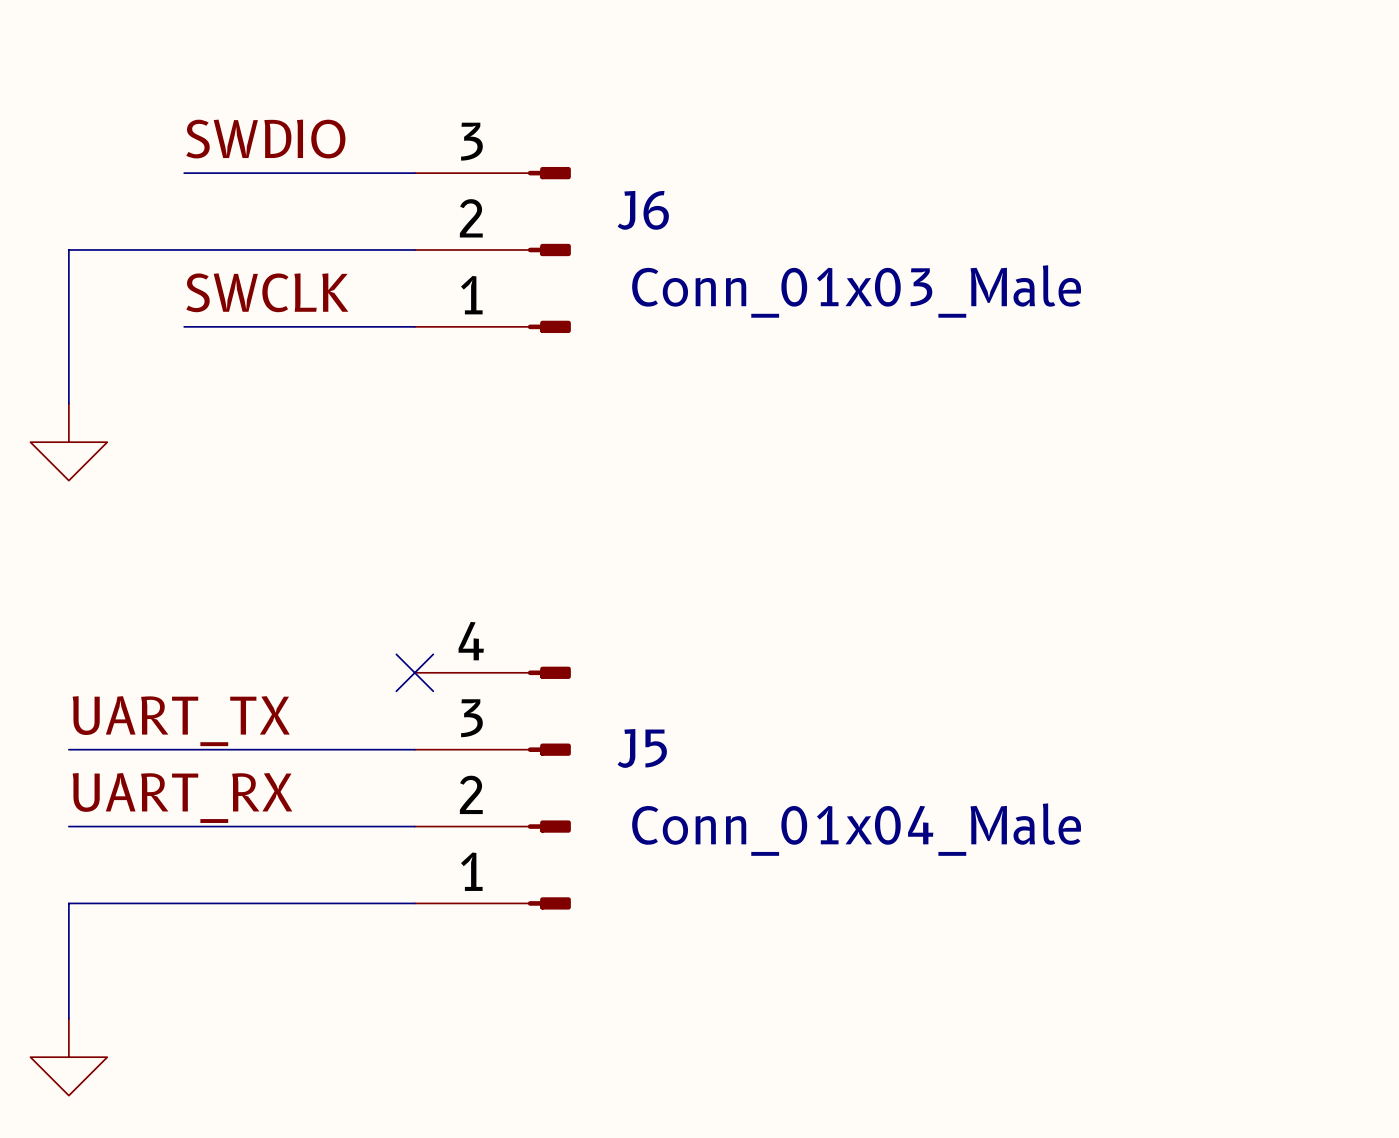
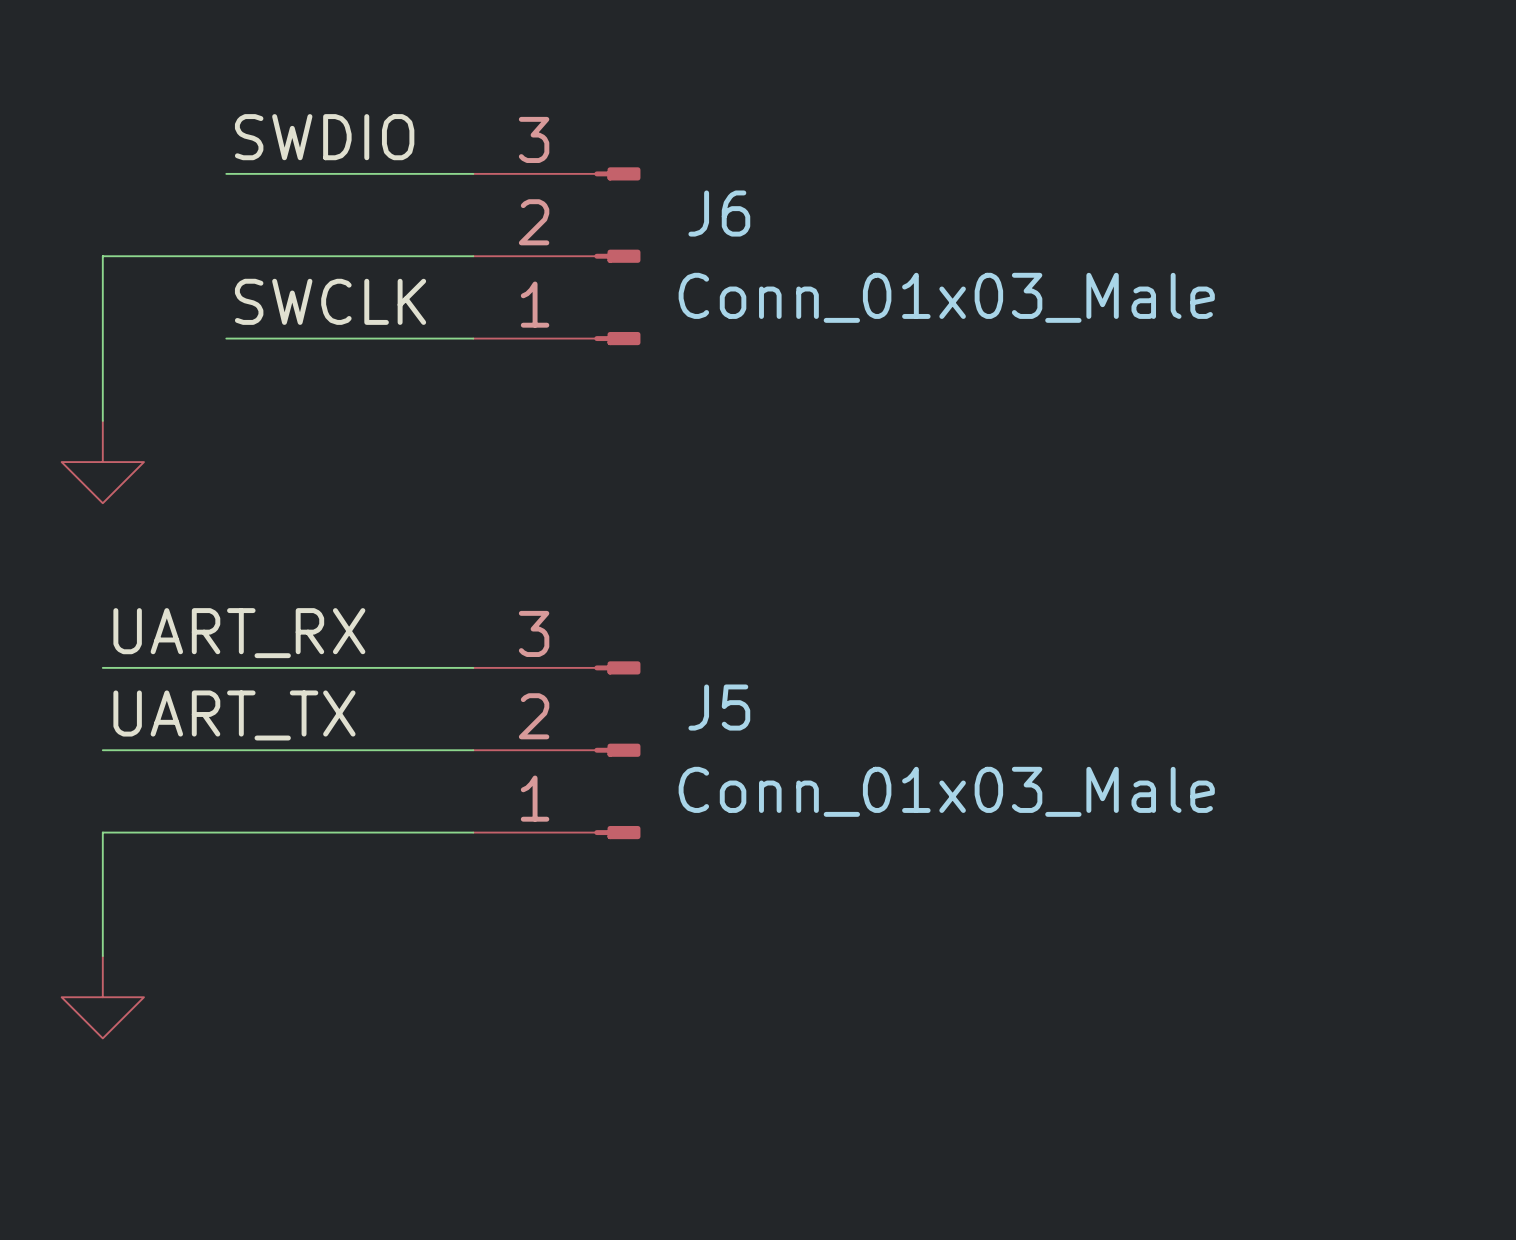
J5 symbol: [414, 666, 571, 910] -> [473, 661, 641, 840]
no-connect mark: (414, 672) -> none
label position: UART_TX (181, 721) -> UART_TX (234, 715)
wire: (68, 749) (414, 749) -> (102, 667) (473, 667)
label position: UART_RX (182, 798) -> UART_RX (239, 633)
wire: (68, 826) (414, 826) -> (102, 750) (473, 750)
J5 value: Conn_01x04_Male (856, 829) -> Conn_01x03_Male (946, 791)
wire: (414, 903) (68, 903) (68, 1018) -> (473, 832) (102, 832) (102, 956)
power symbol position: (68, 1057) -> (102, 997)

